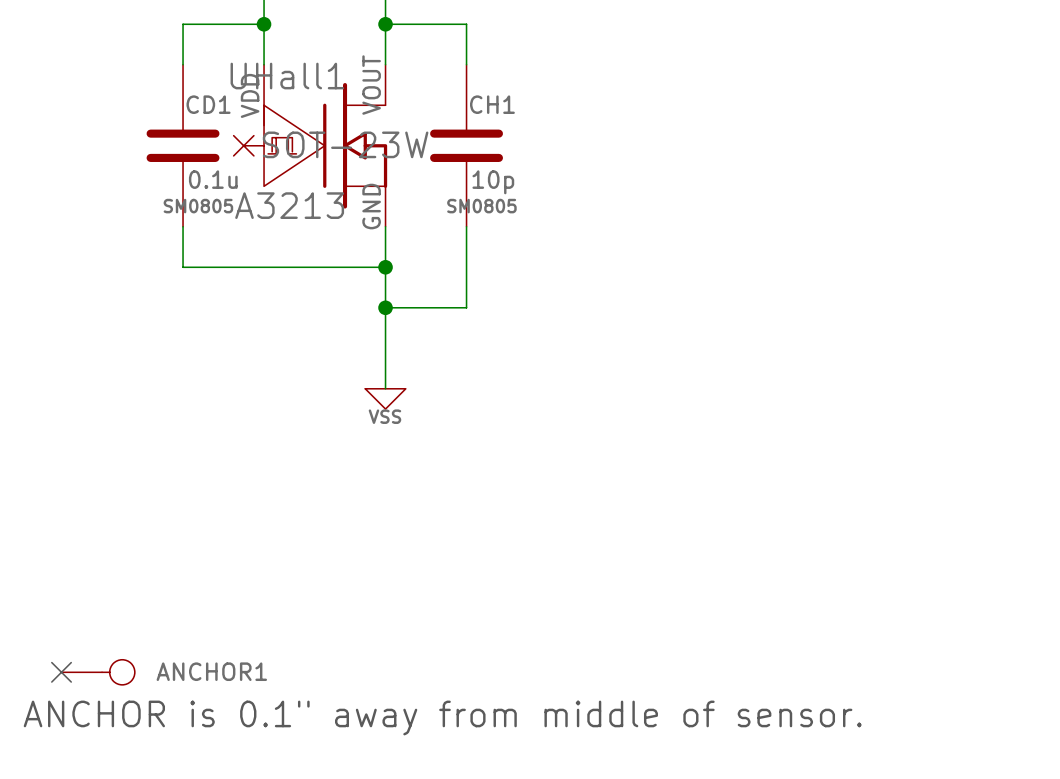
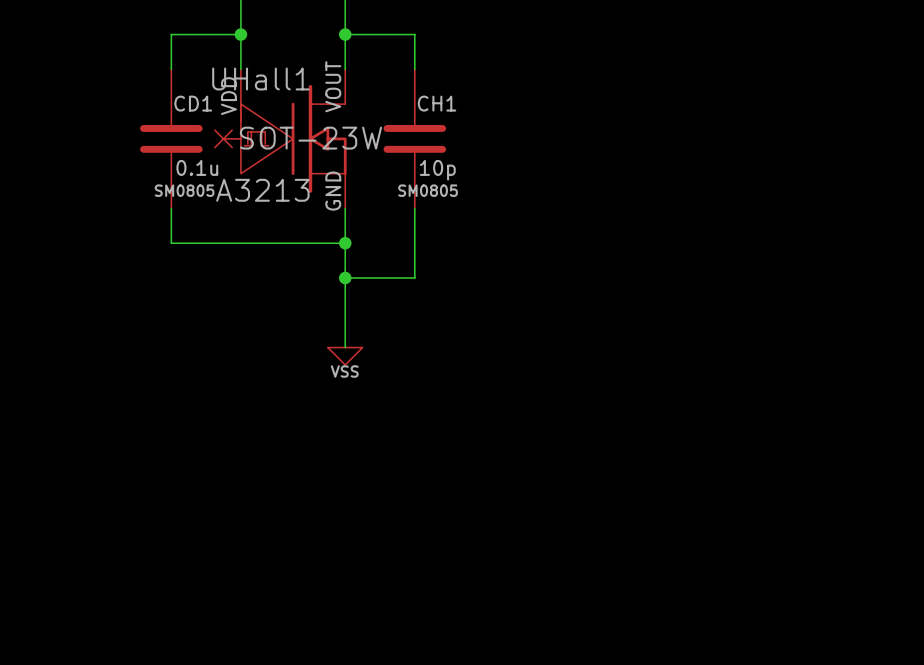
no-connect mark: (61, 672) -> none
ANCHOR1: (98, 672) -> none
text: ANCHOR is 0.1" away from middle of sensor. (442, 718) -> none

